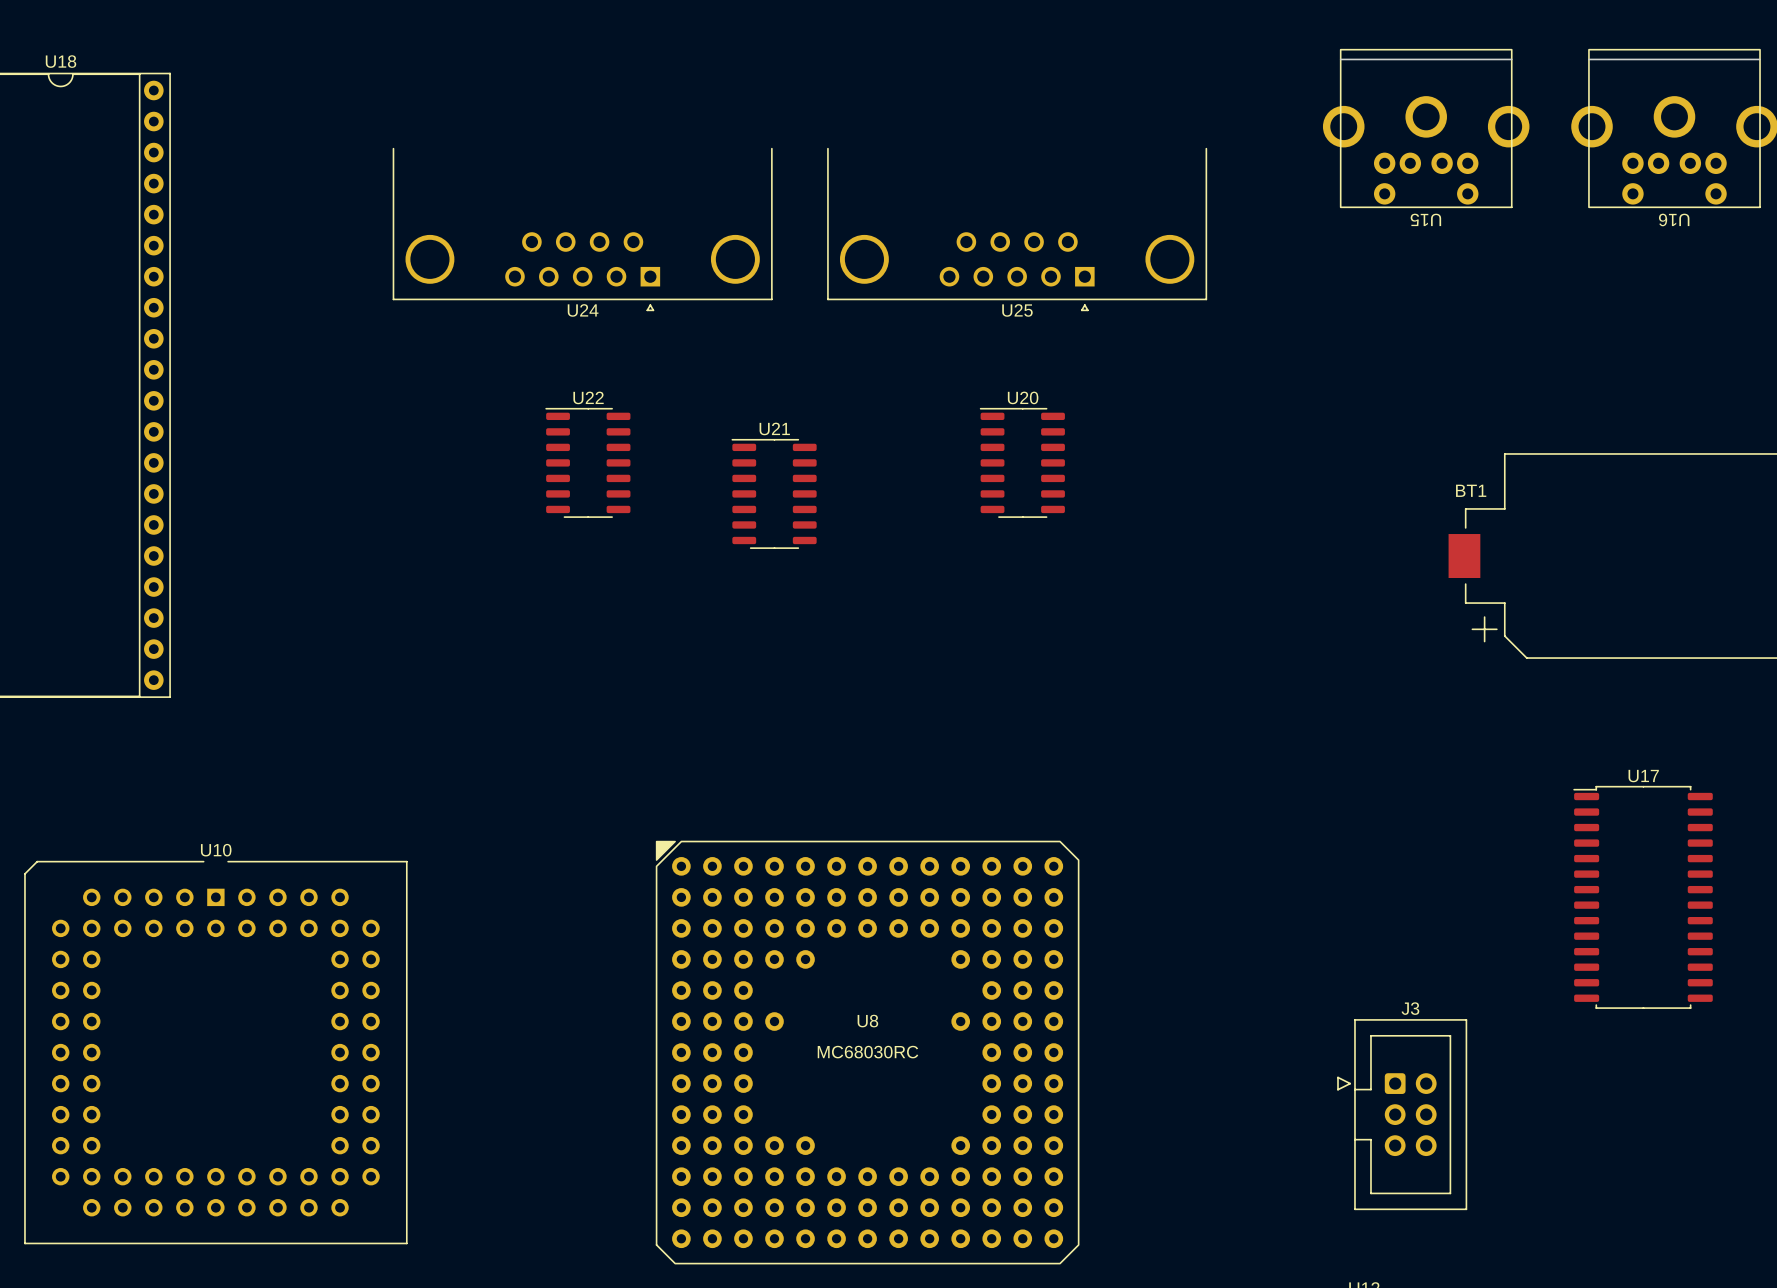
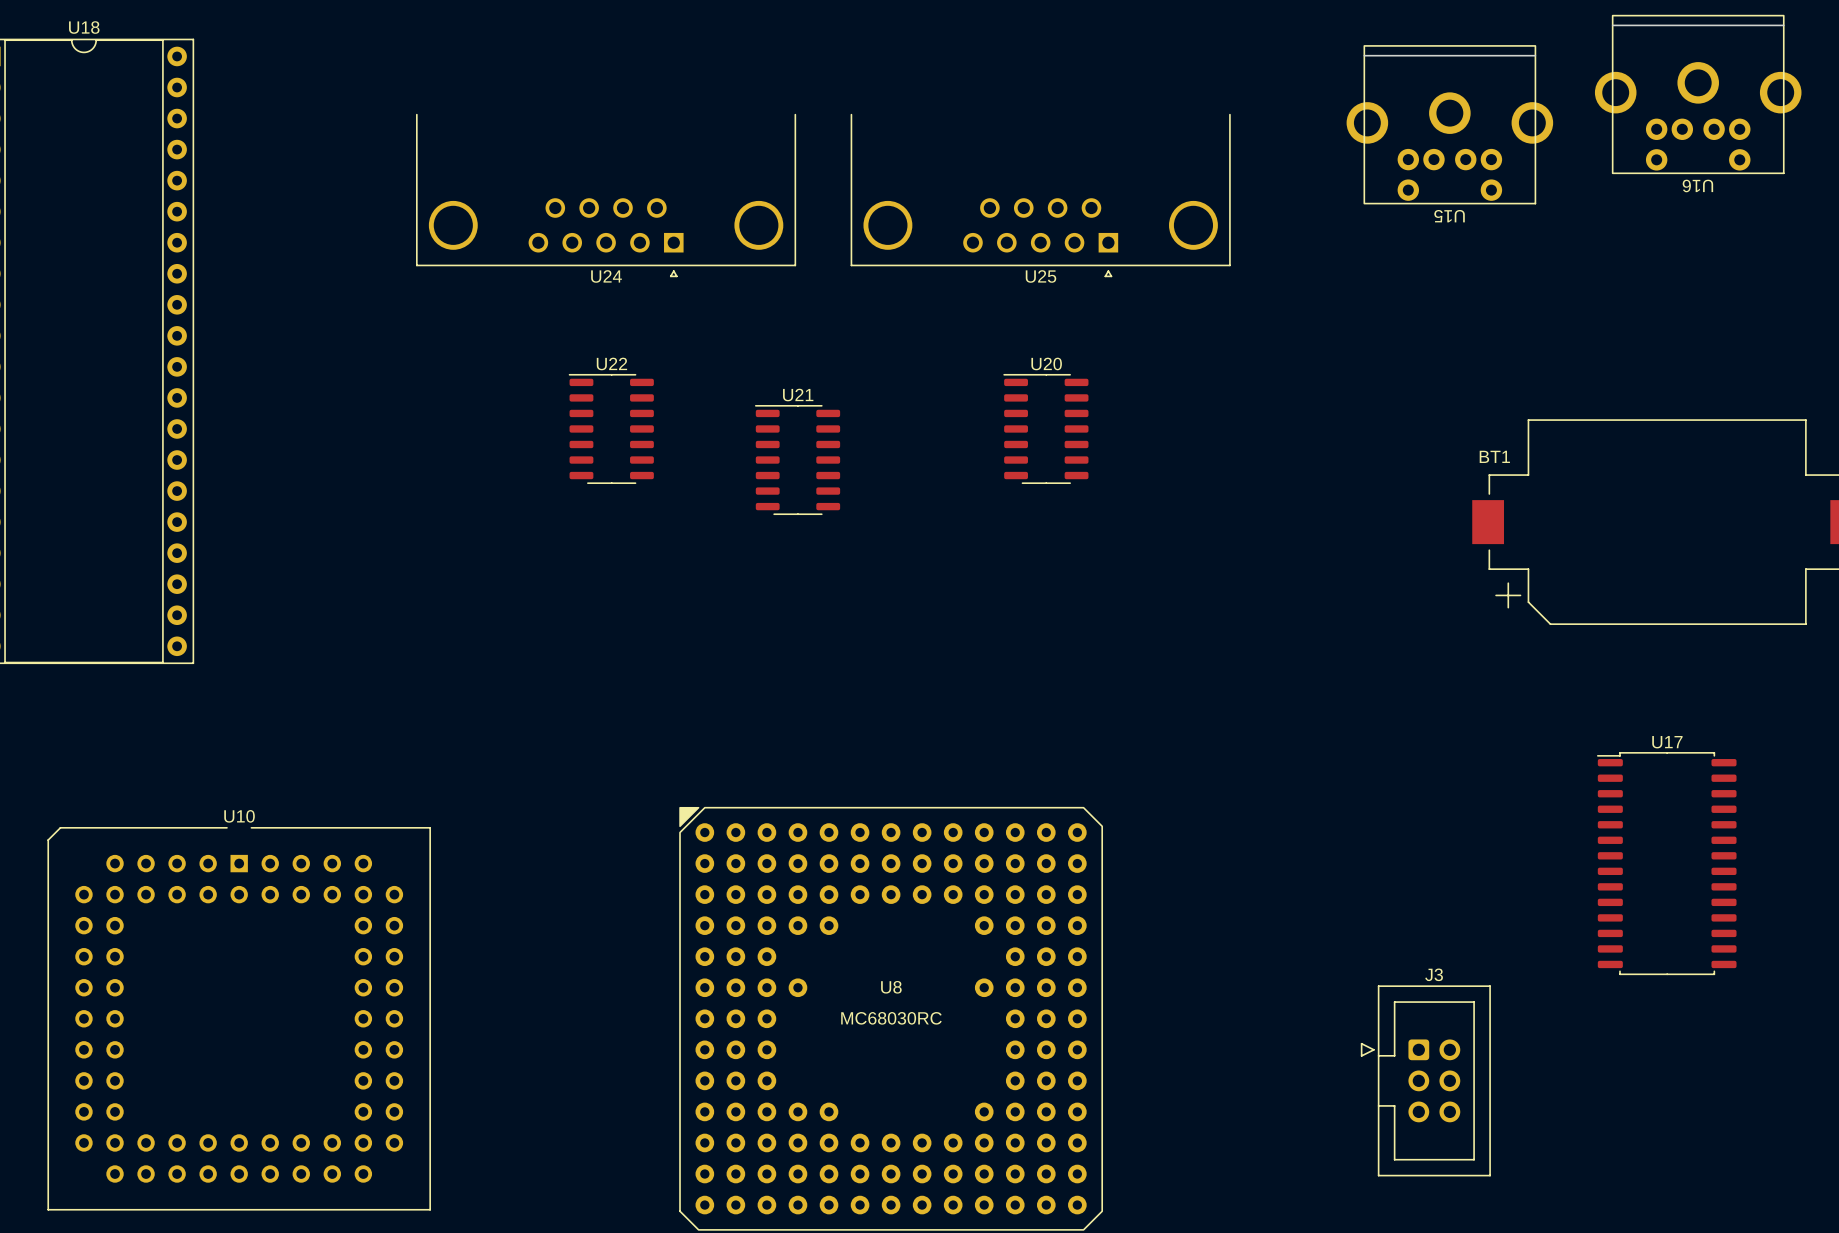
U15 position: (1426, 128) -> (1449, 124)

